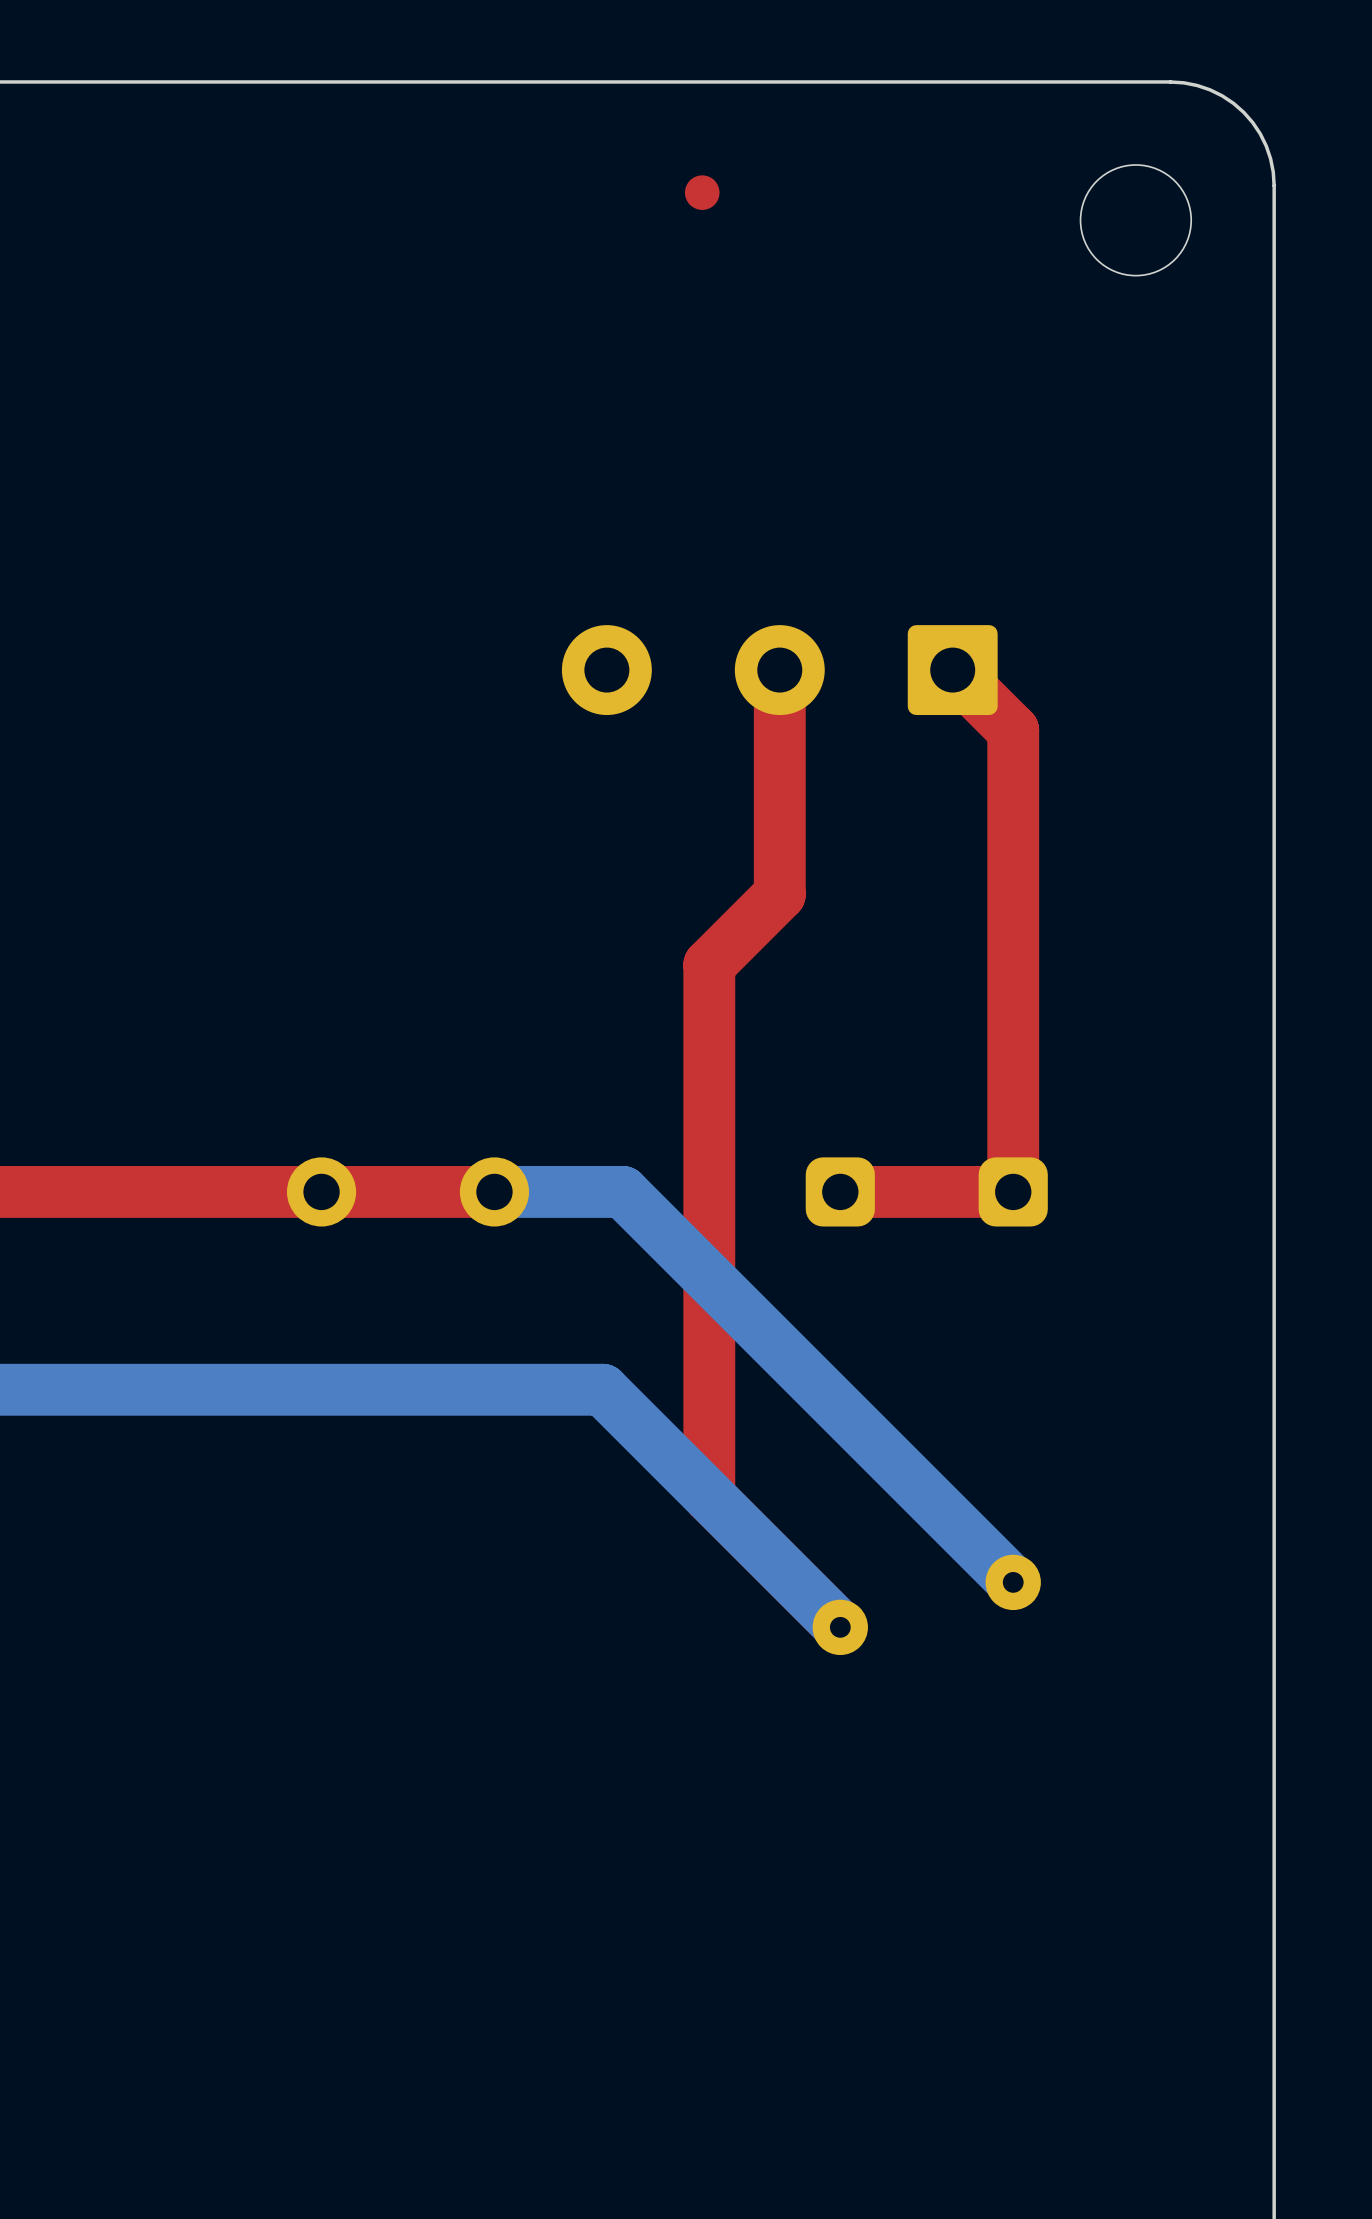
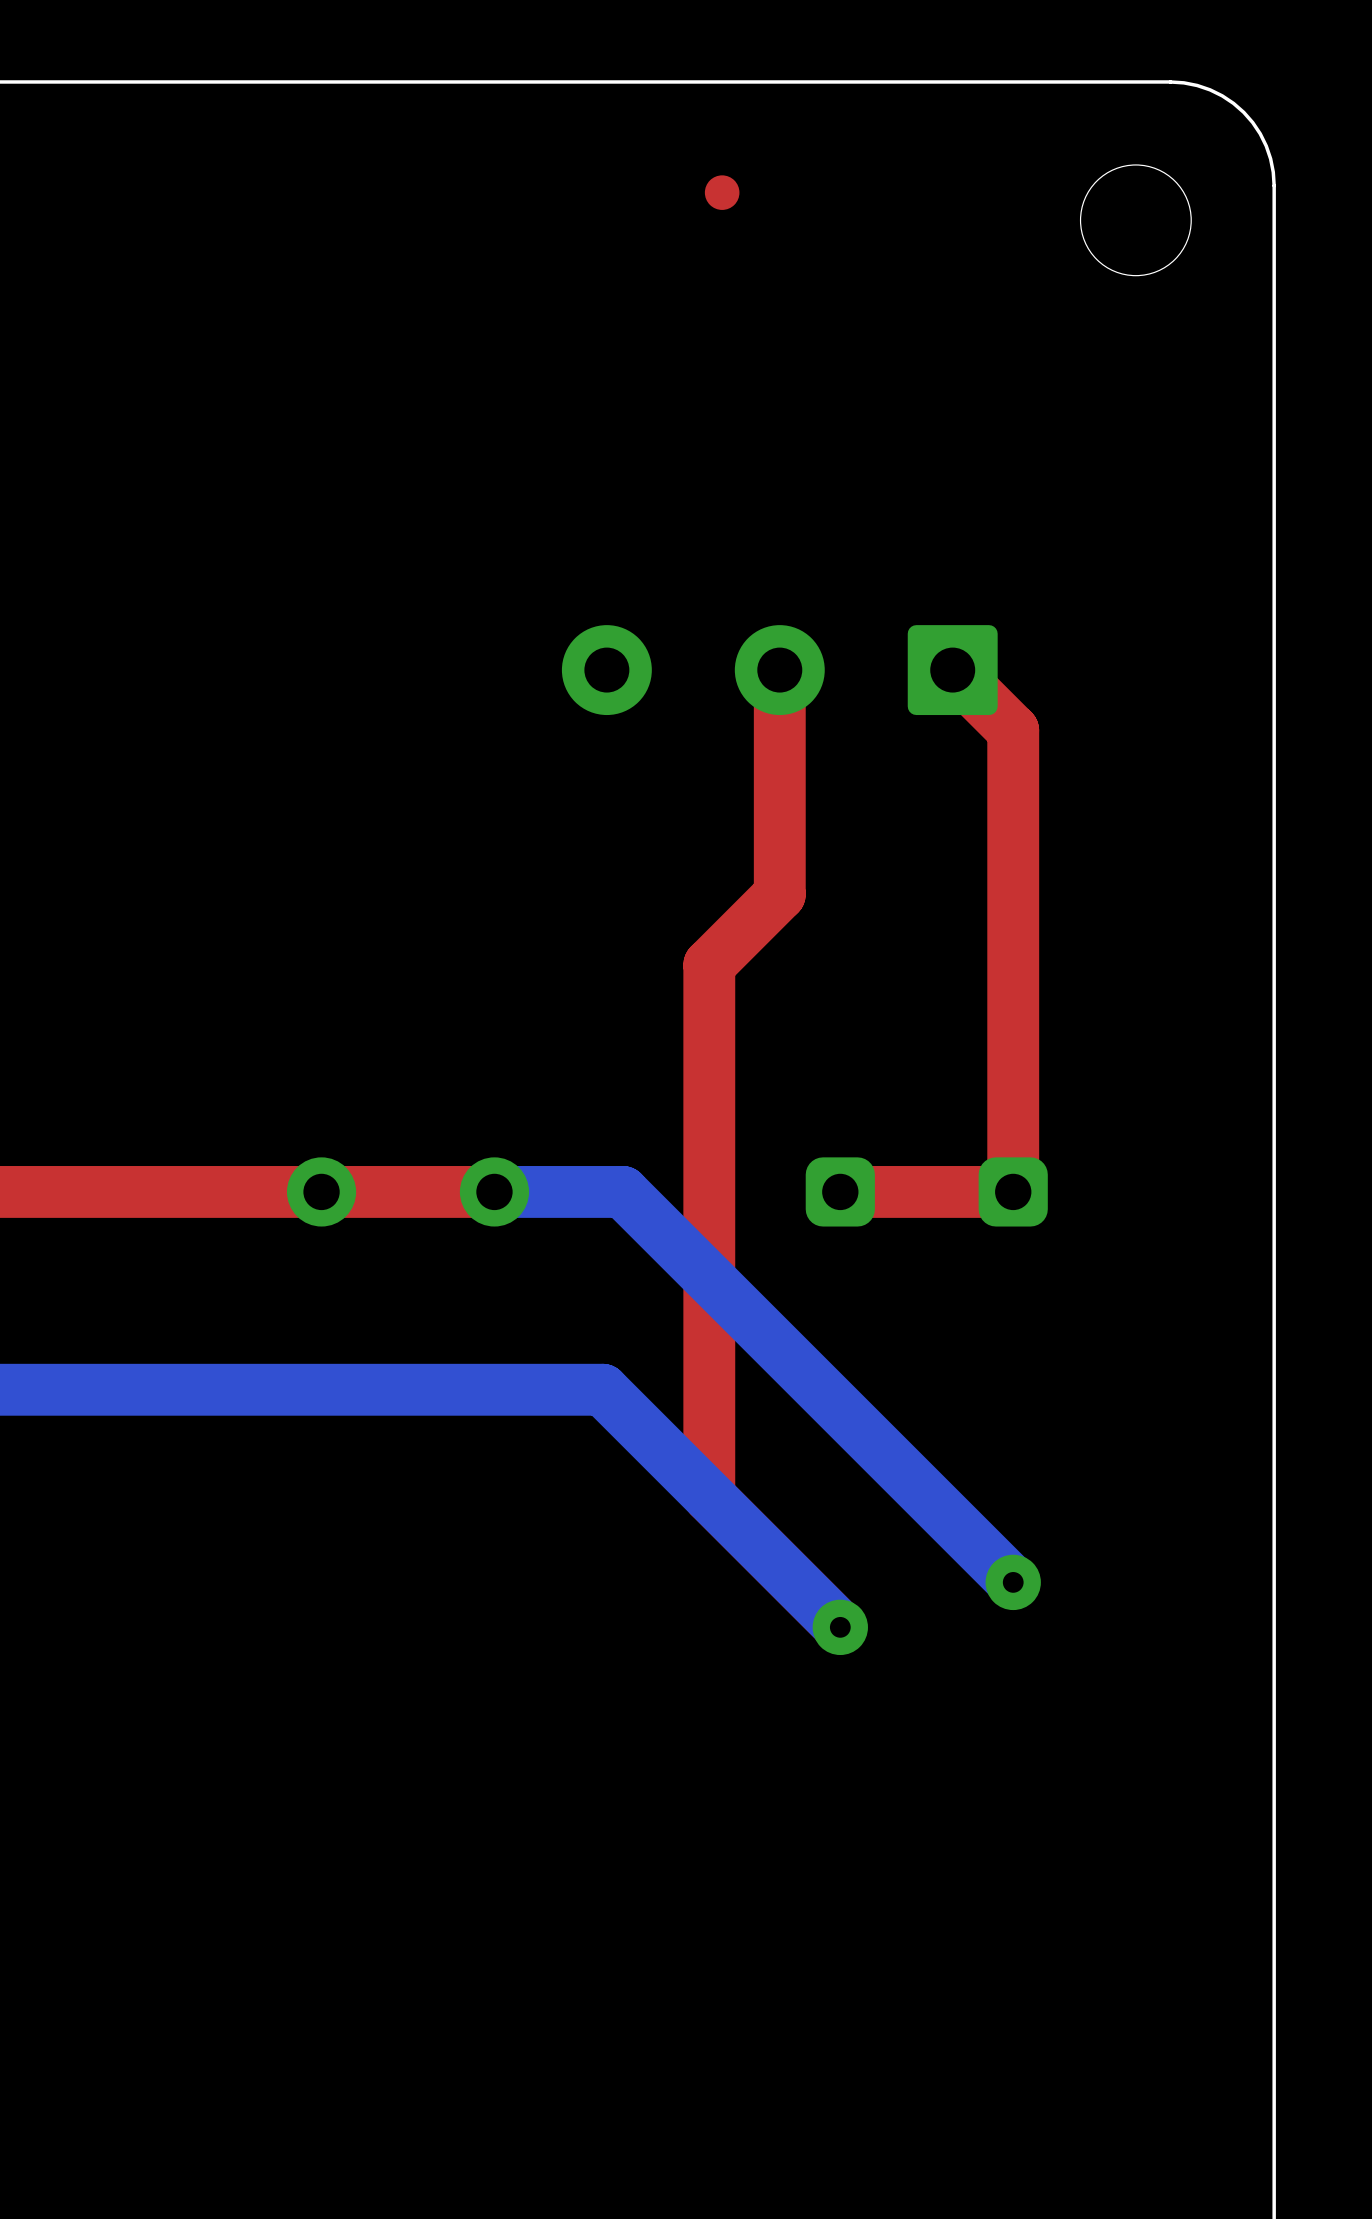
part position: (702, 192) -> (722, 192)

